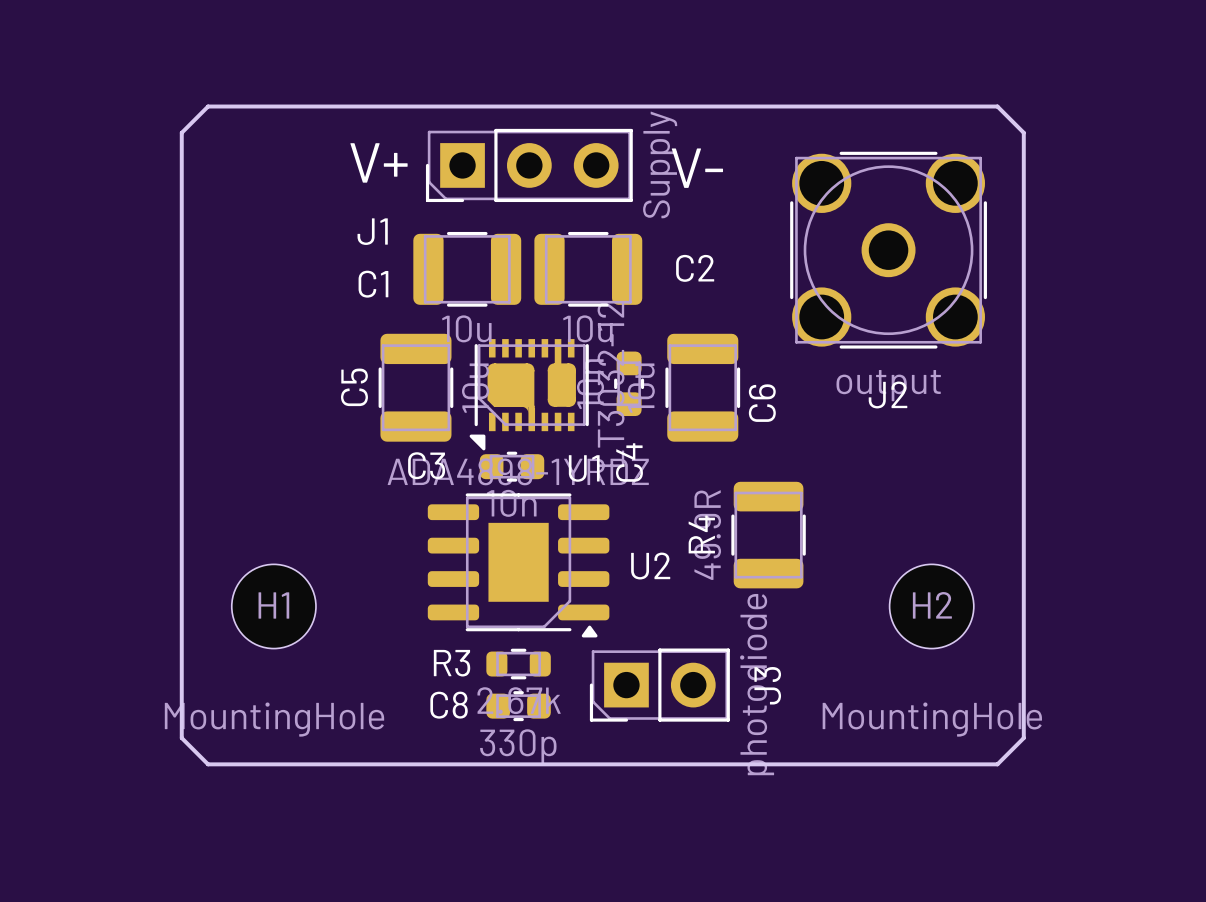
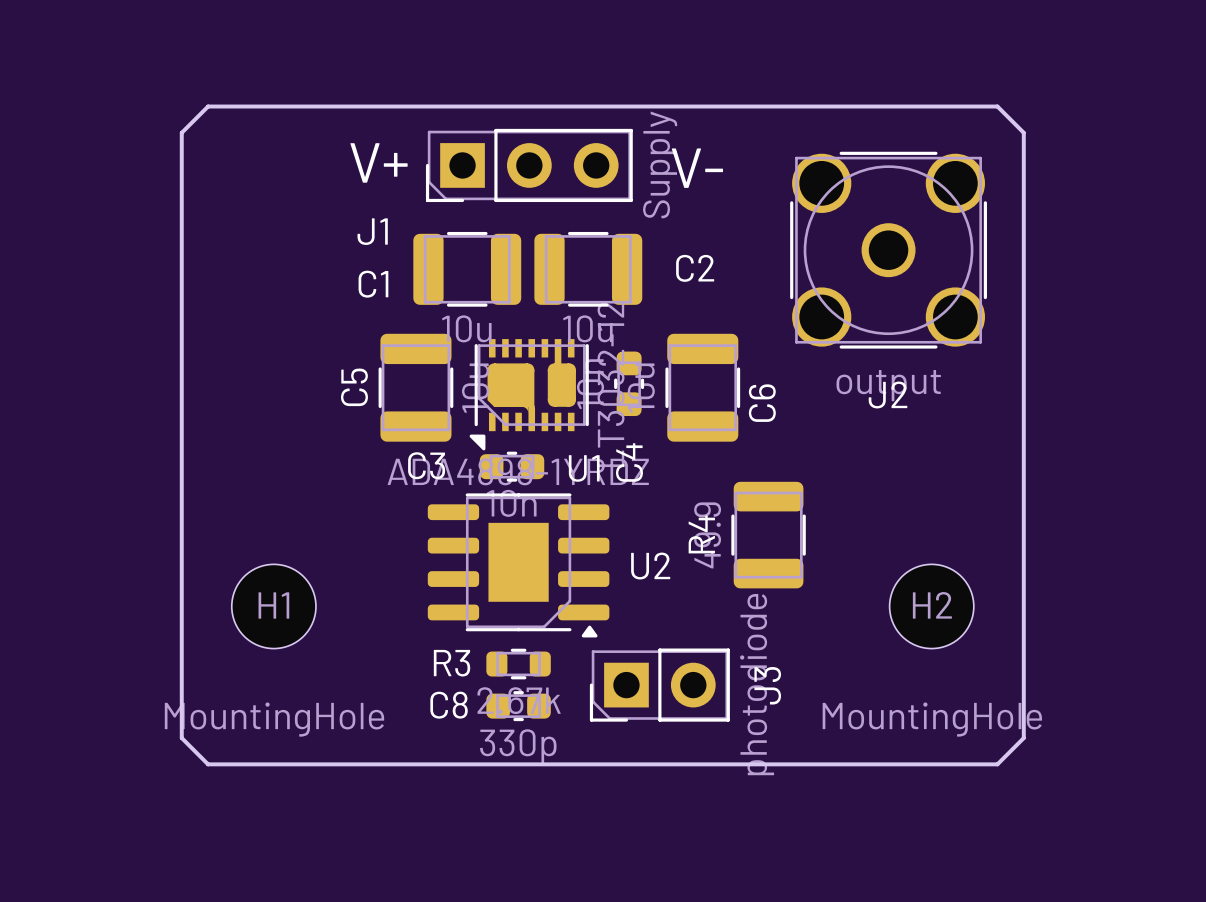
R4 value: 49.9R (707, 535) -> 49.9 (707, 535)

